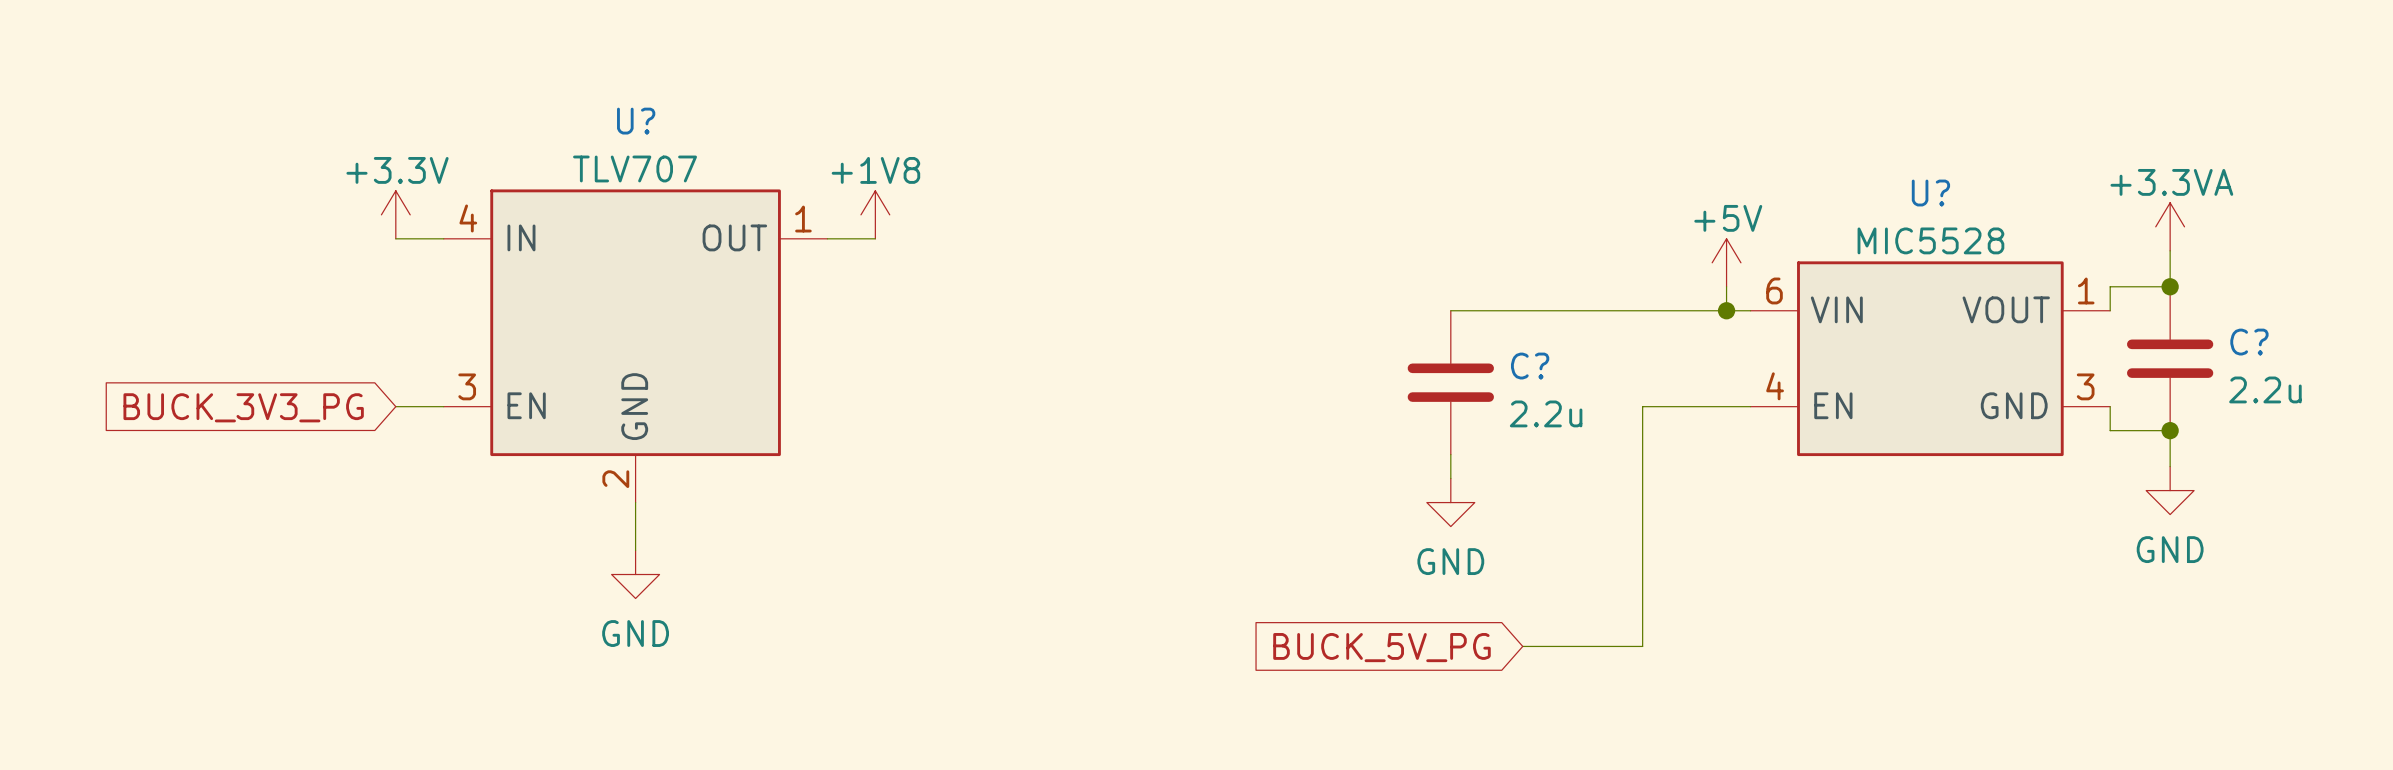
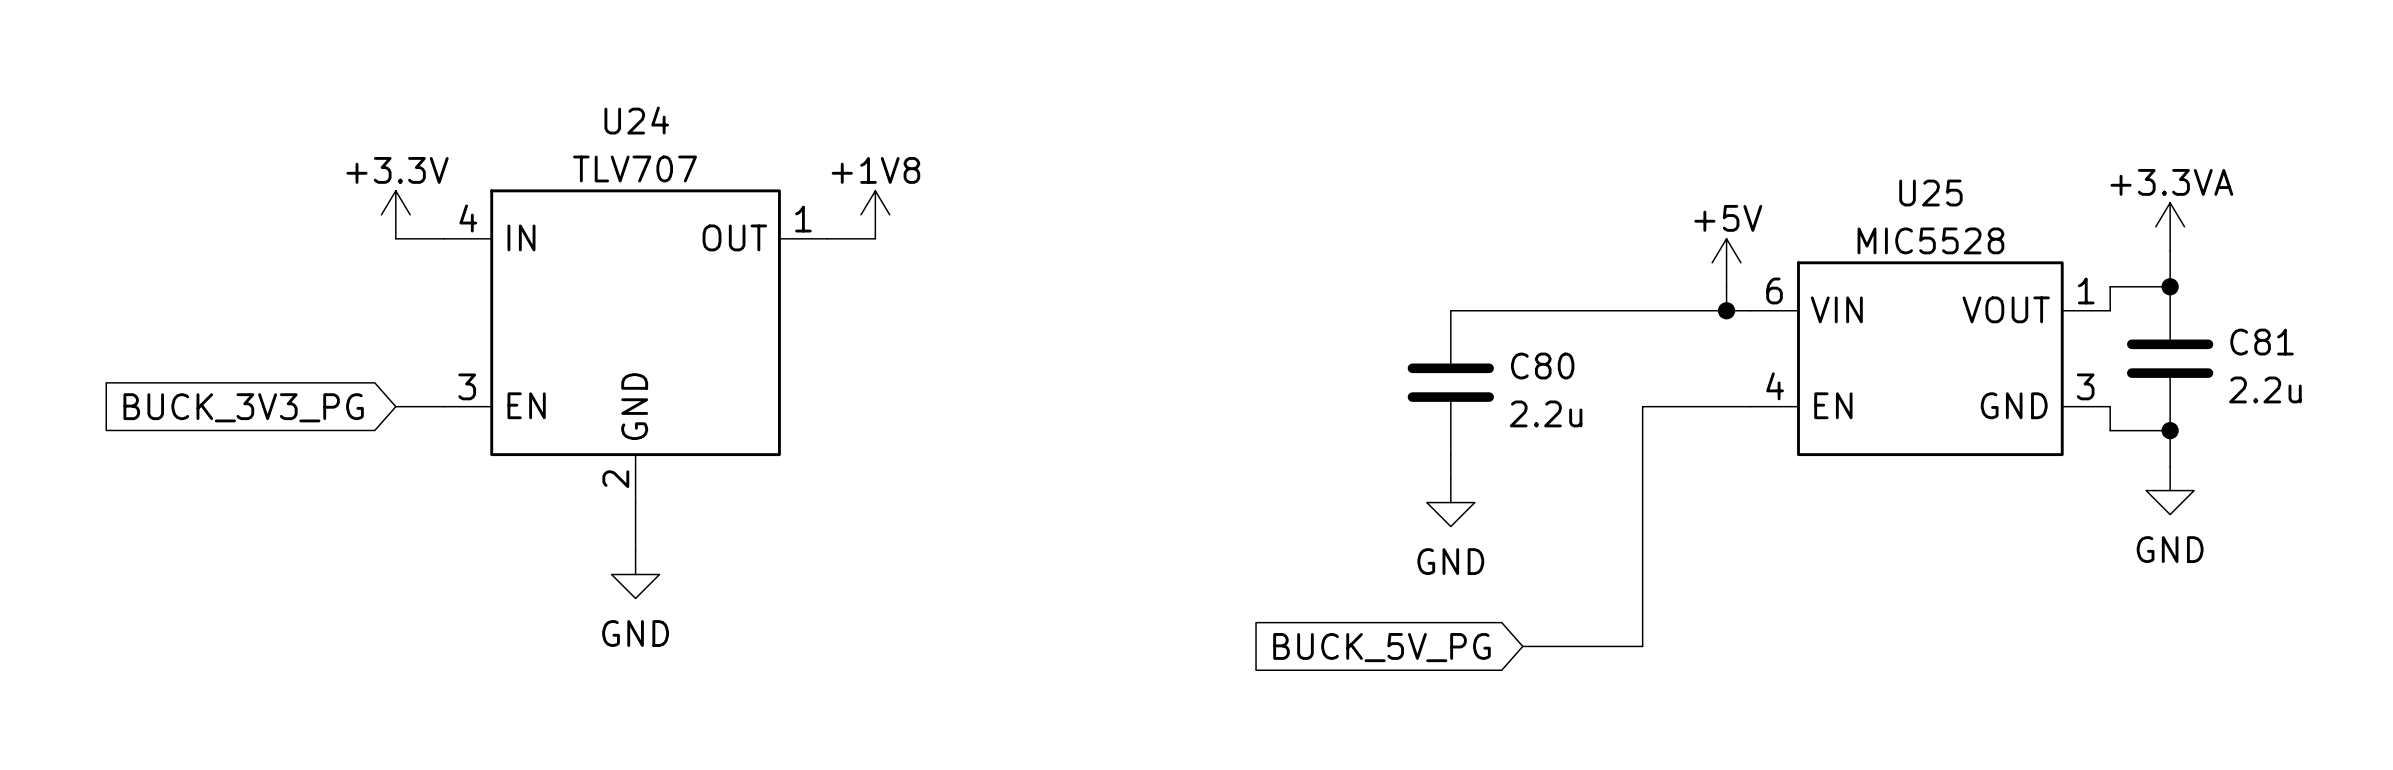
U? name: U? (636, 121) -> U24 (636, 120)
U? name: U? (1930, 193) -> U25 (1930, 193)
C? name: C? (2249, 342) -> C81 (2262, 342)
C? name: C? (1530, 366) -> C80 (1542, 366)

